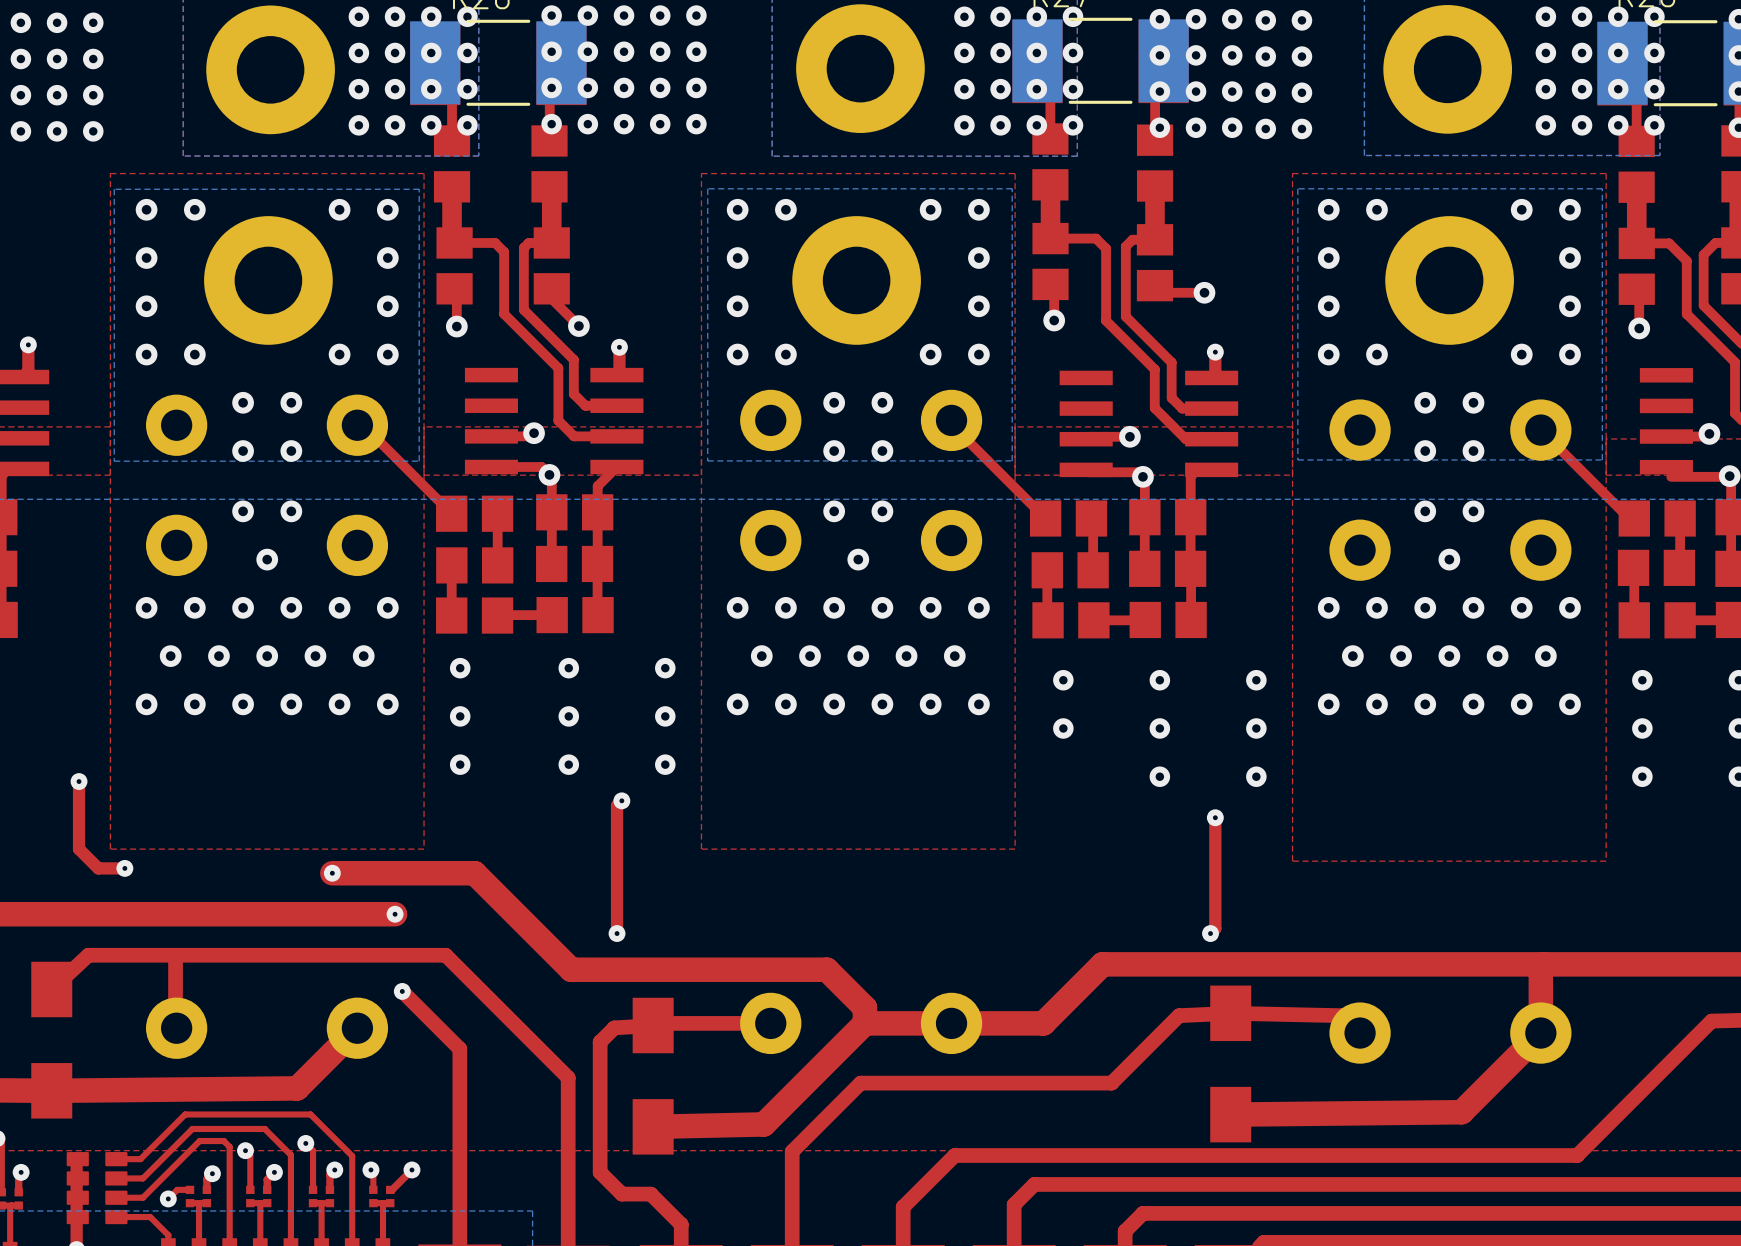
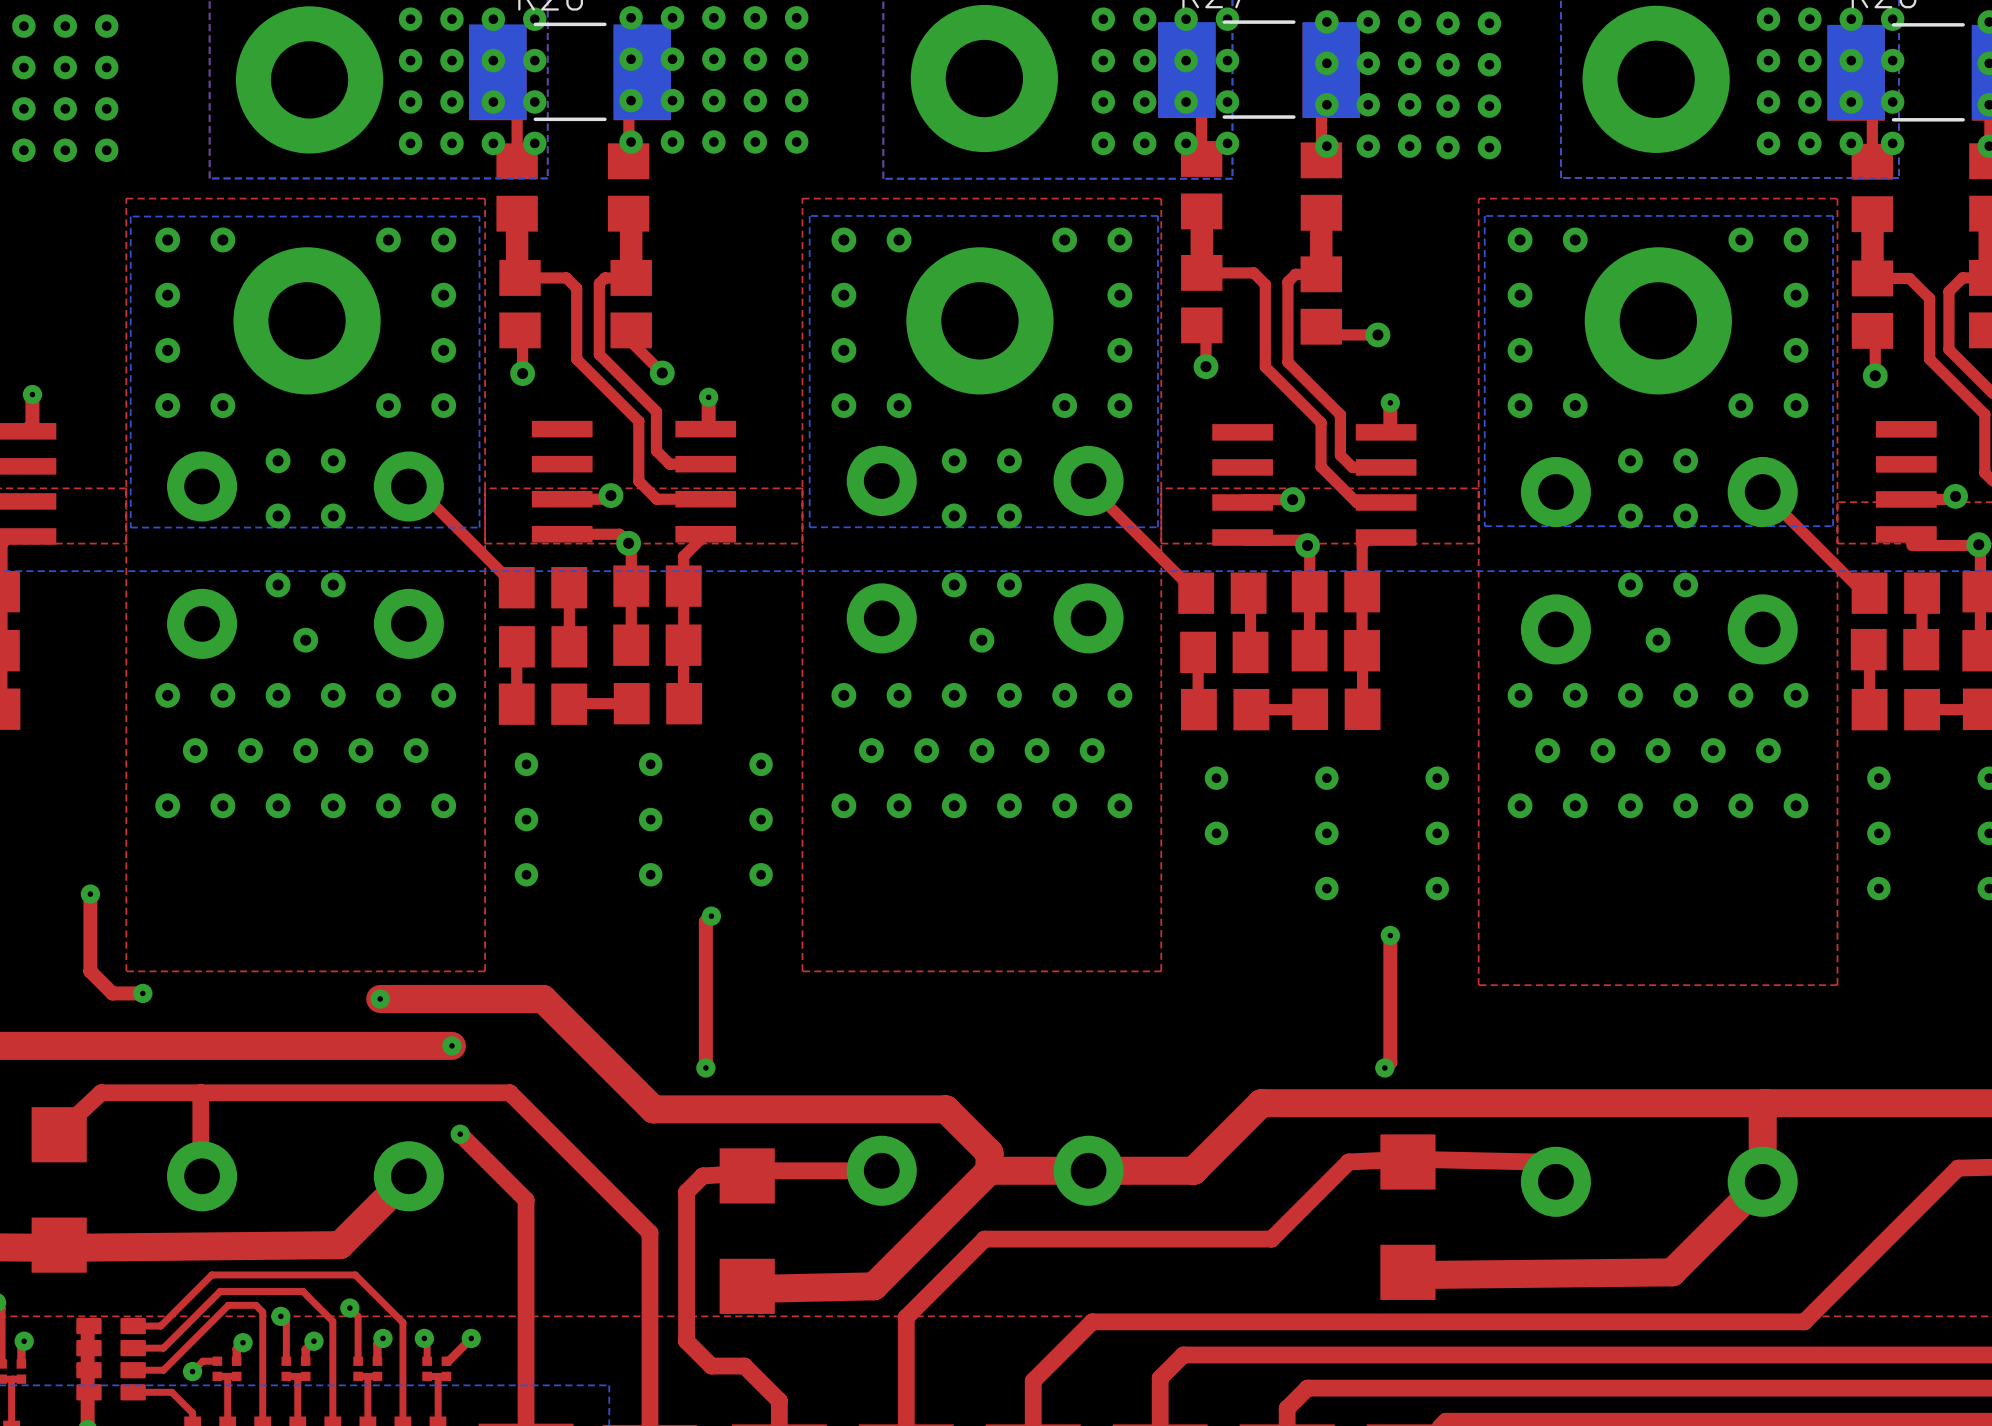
part footprint: [31, 961, 73, 1119] -> [31, 1107, 87, 1273]
part footprint: [1210, 985, 1252, 1143] -> [1380, 1134, 1436, 1300]
part footprint: [632, 997, 674, 1155] -> [719, 1148, 775, 1314]

